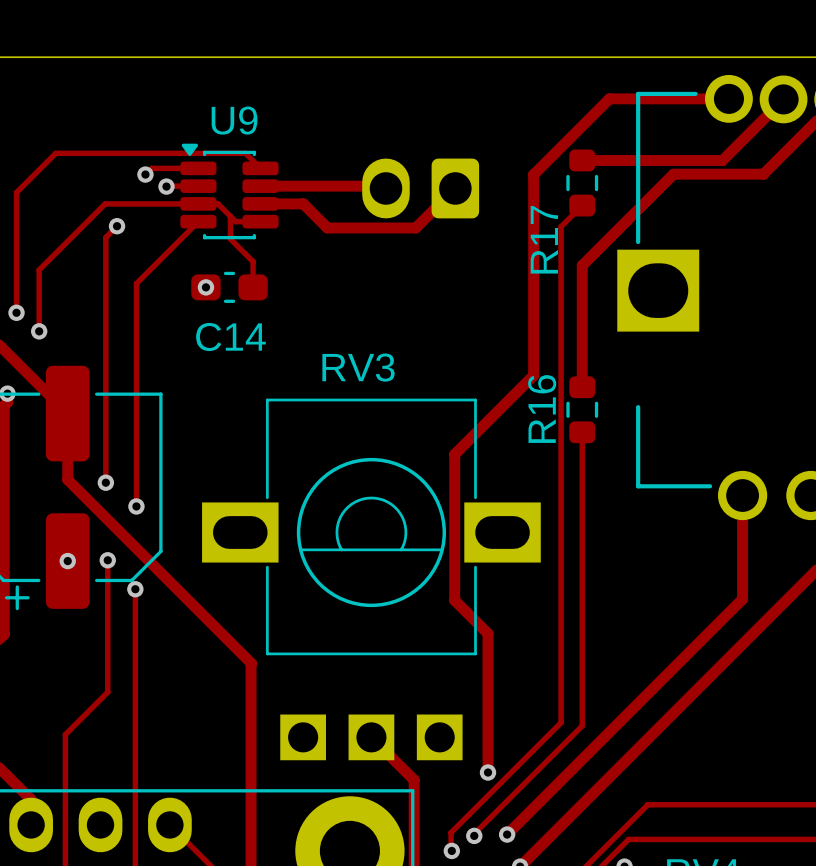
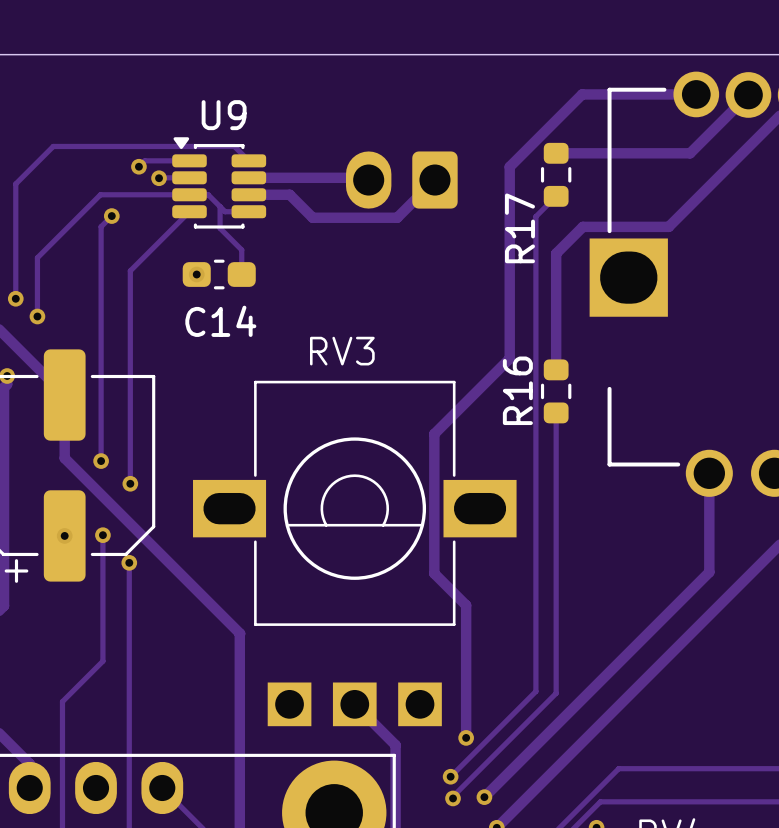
track: (763, 174) (673, 174) (610, 237) -> (729, 166) (668, 226) (582, 226)
track: (561, 722) (451, 832) (451, 850) -> (535, 690) (450, 776)
via position: (451, 850) -> (450, 776)

